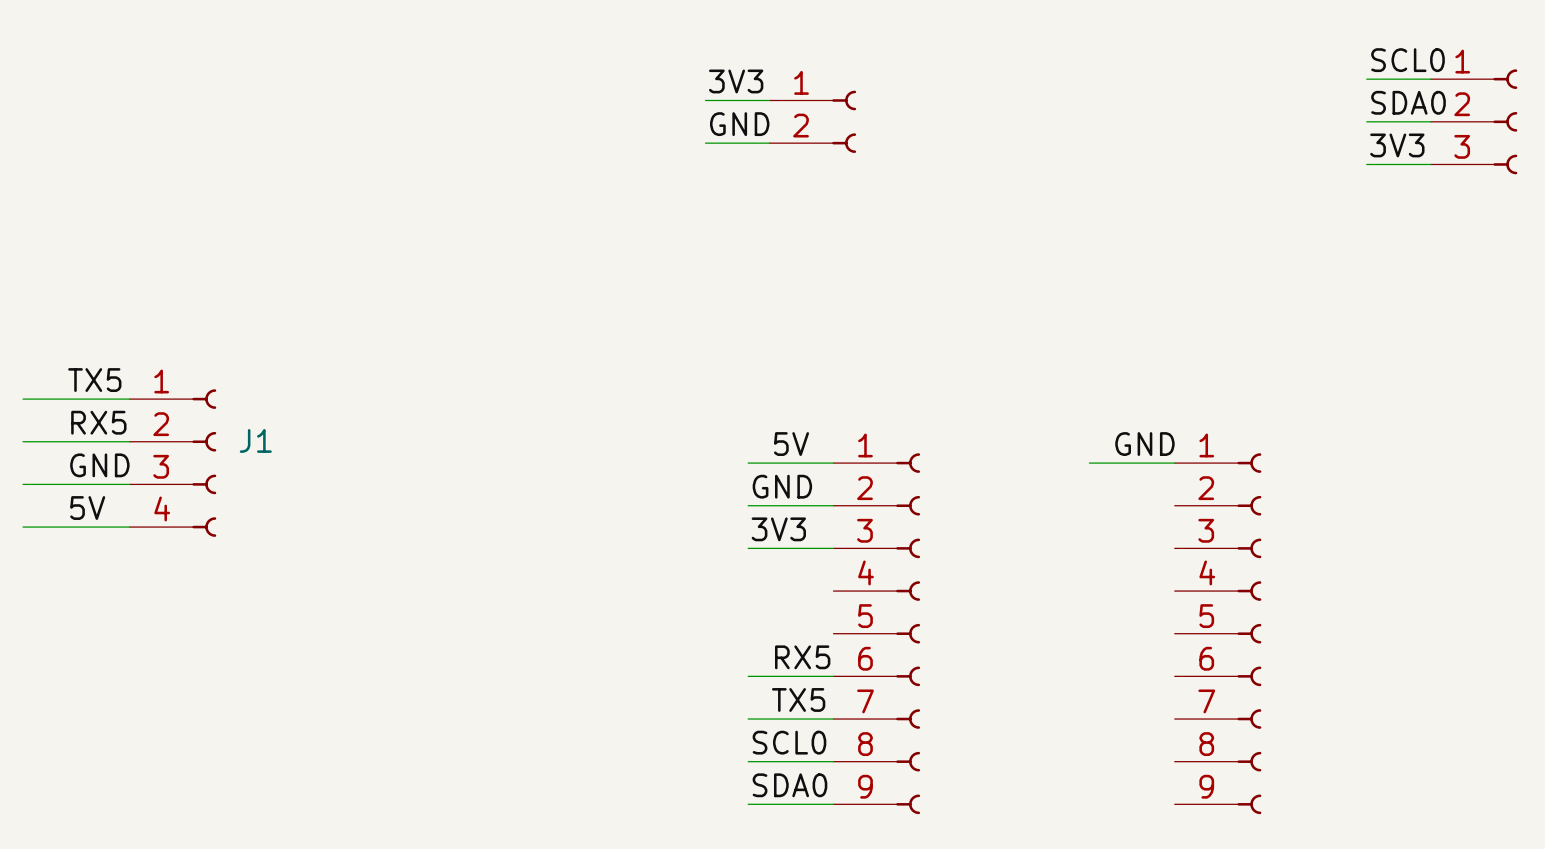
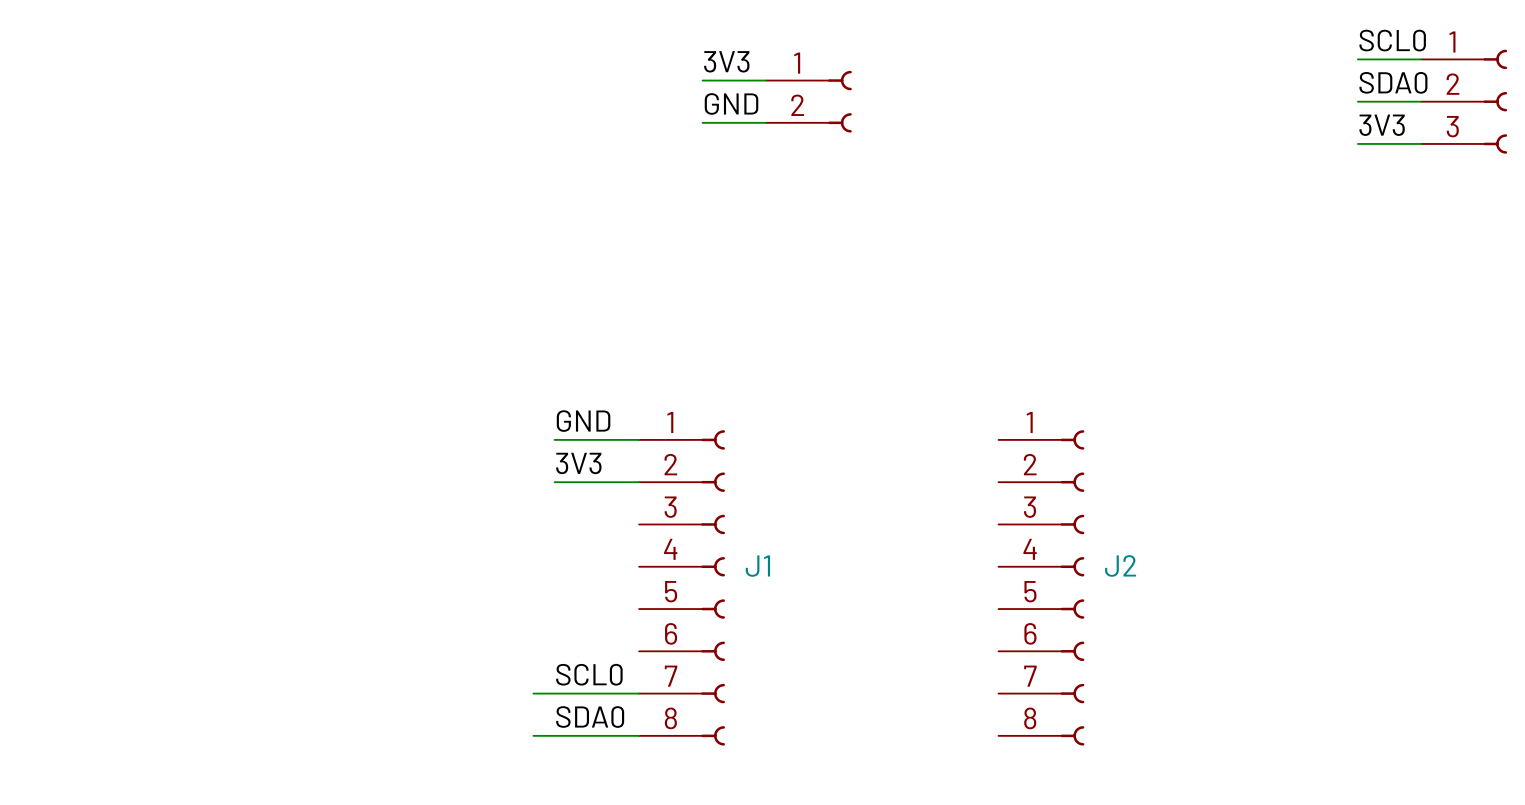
label: TX5 (94, 380) -> none
J1 symbol: [129, 389, 217, 537] -> [639, 430, 725, 746]
wire: (23, 399) (129, 399) -> none
label: RX5 (98, 422) -> none
wire: (23, 441) (129, 441) -> none
label: 5V (791, 444) -> none
label: GND (1144, 444) -> none
wire: (748, 463) (833, 463) -> (554, 439) (639, 439)
wire: (1089, 463) (1174, 463) -> none
label: GND (99, 465) -> none
wire: (23, 484) (129, 484) -> none
label position: GND (782, 486) -> GND (583, 421)
wire: (748, 505) (833, 505) -> (554, 482) (639, 482)
label: 5V (87, 508) -> none
wire: (23, 527) (129, 527) -> none
label position: 3V3 (778, 529) -> 3V3 (578, 463)
wire: (748, 548) (833, 548) -> none
J2: none -> (1041, 587)
part: (876, 633) -> none
part: (1218, 633) -> none
label: RX5 (802, 657) -> none
wire: (748, 676) (833, 676) -> none
label: TX5 (798, 699) -> none
wire: none -> (533, 693) (639, 693)
wire: (748, 719) (833, 719) -> none
label position: SCL0 (789, 742) -> SCL0 (589, 674)
wire: none -> (533, 735) (639, 735)
wire: (748, 761) (833, 761) -> none
label position: SDA0 (789, 785) -> SDA0 (590, 717)
wire: (748, 804) (833, 804) -> none

